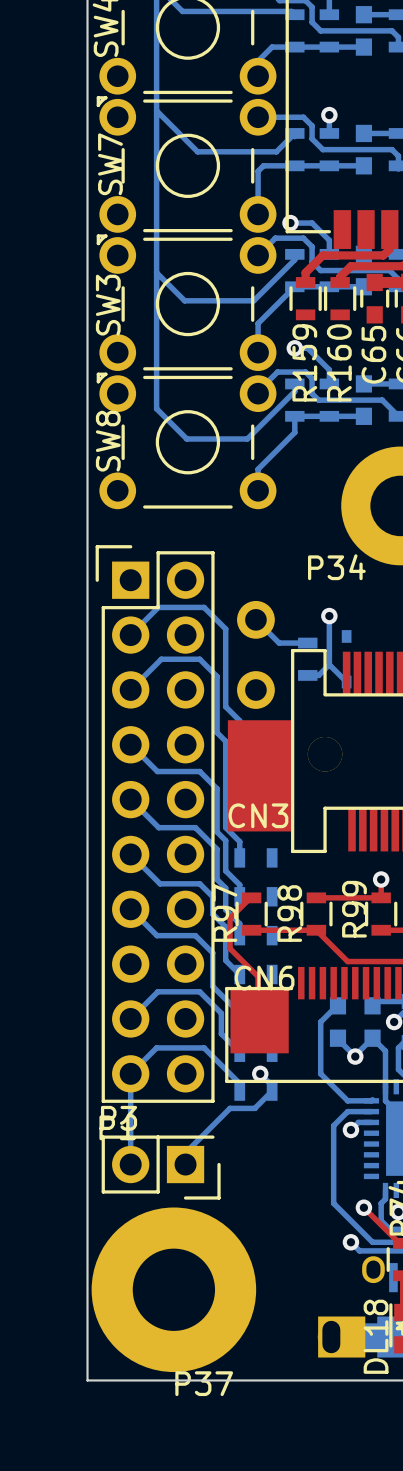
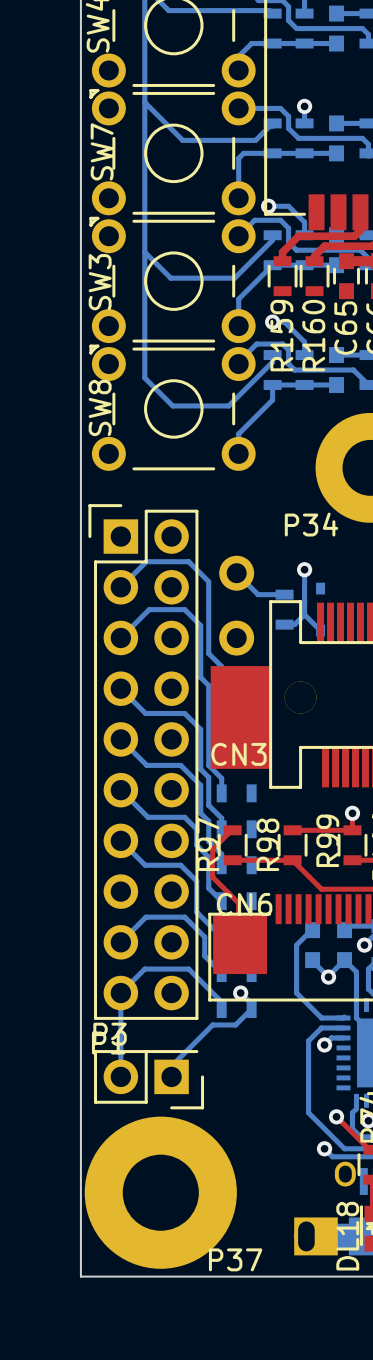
P37 name position: P37 (204, 1383) -> P37 (235, 1259)

